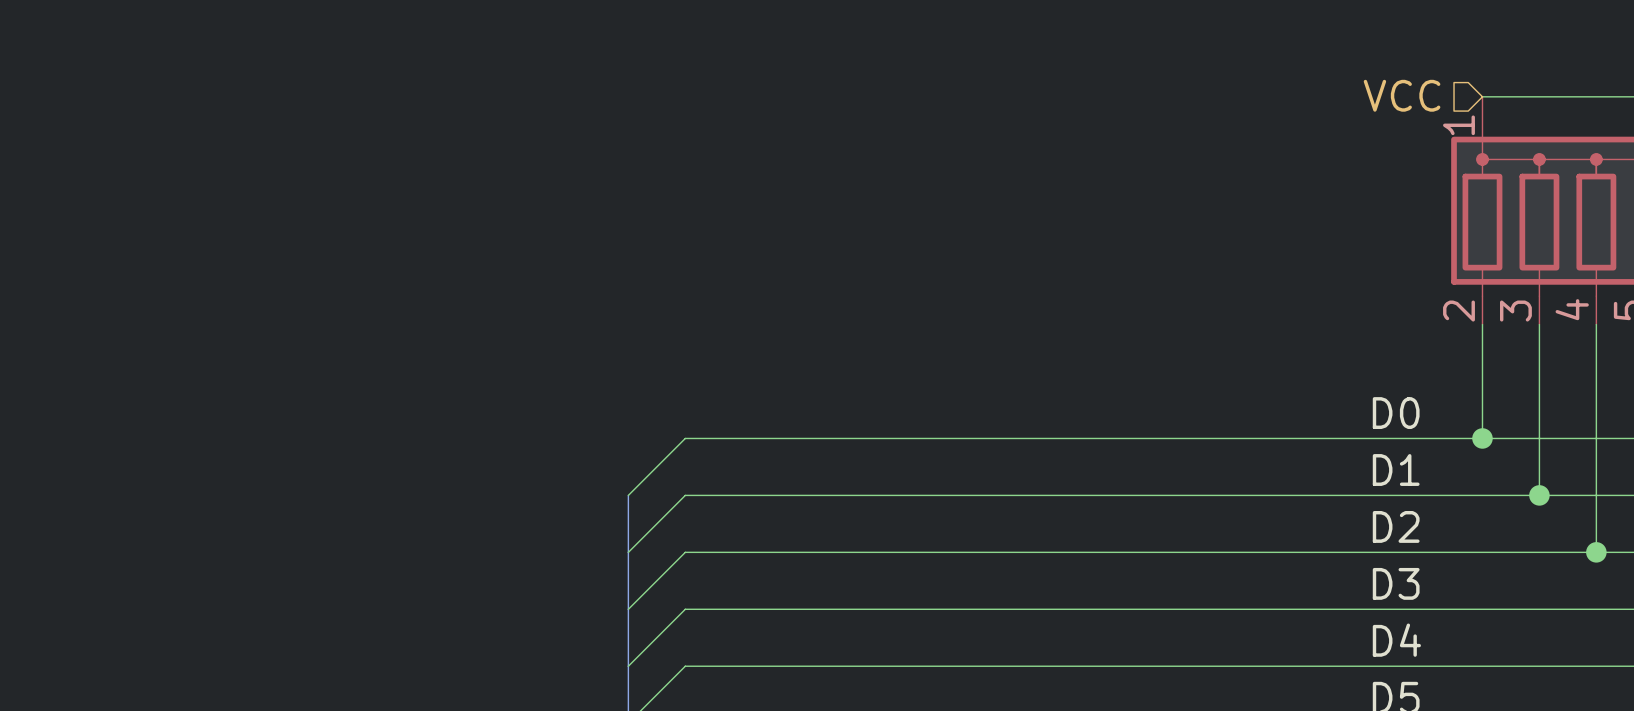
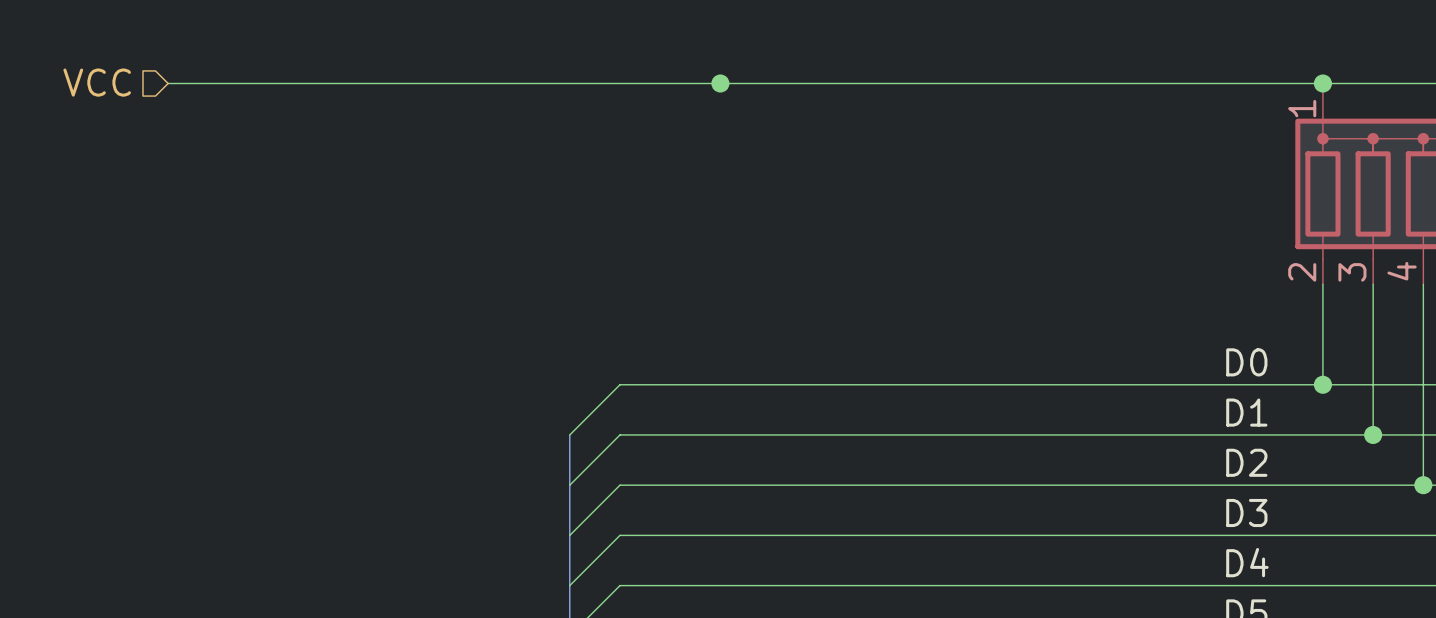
hierarchical label: none -> VCC (97, 82)
hierarchical label: VCC (1402, 95) -> none
wire: none -> (168, 83) (1322, 83)
junction: none -> (720, 83)
junction: none -> (1322, 83)

